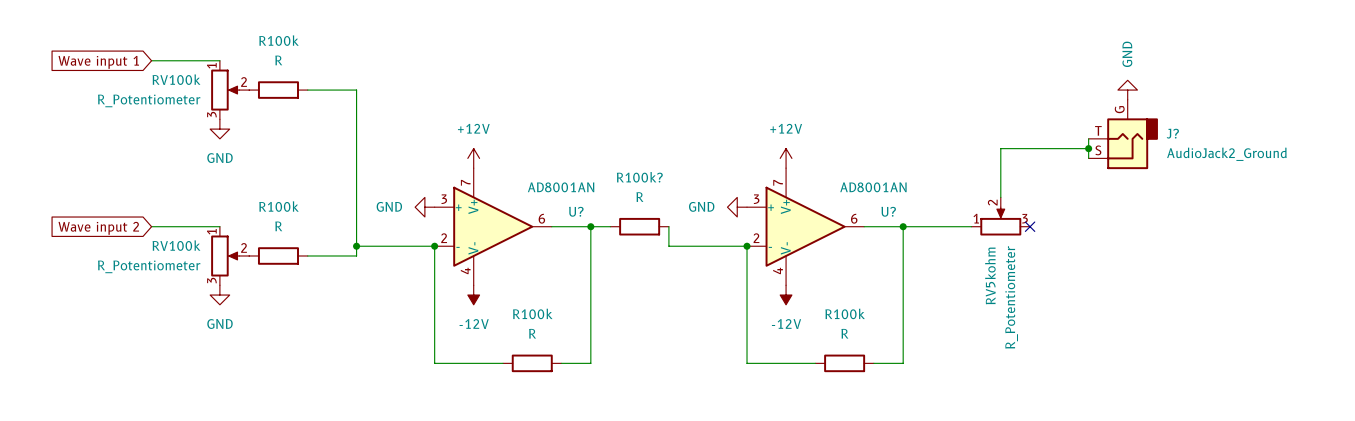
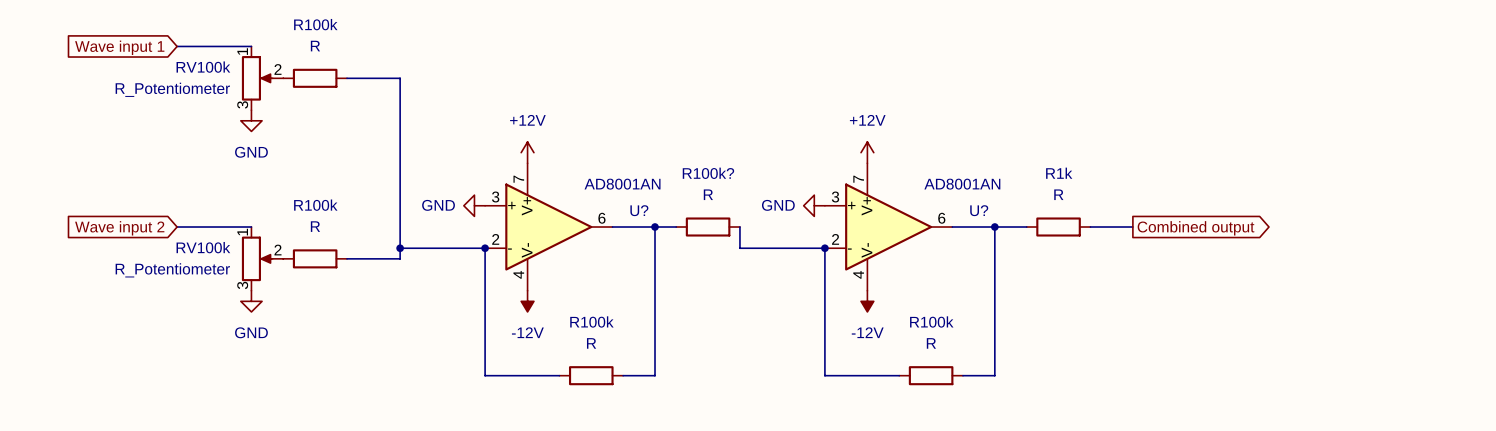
power symbol: GND (1127, 90) -> none
J?: AudioJack2_Ground (1123, 134) -> none
wire: (1088, 138) (1088, 158) -> none
wire: (1088, 148) (1000, 148) (1000, 197) -> none
junction: (1088, 148) -> none
RV5kohm: R_Potentiometer (1000, 216) -> none
wire: (932, 226) (971, 226) -> (1090, 227) (1132, 227)
R1k: none -> R (1058, 227)
no-connect mark: (1030, 226) -> none
global label: none -> Combined output (1196, 228)

